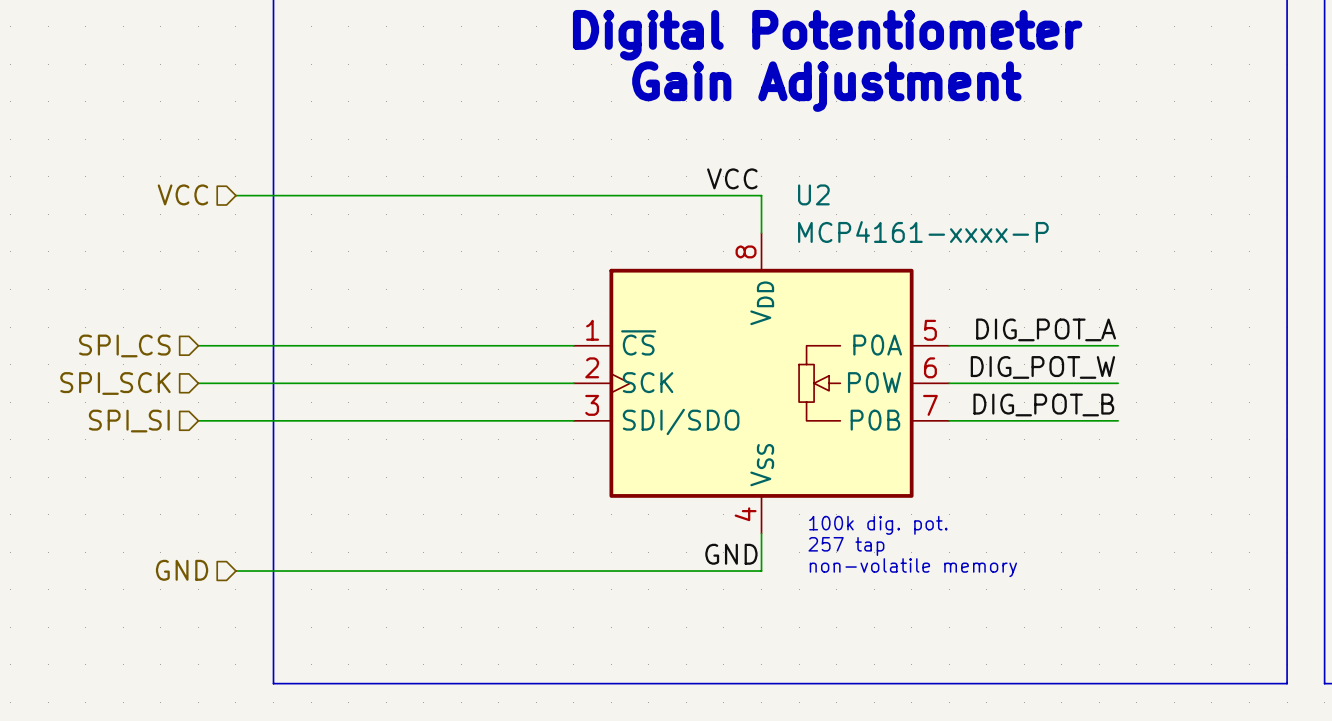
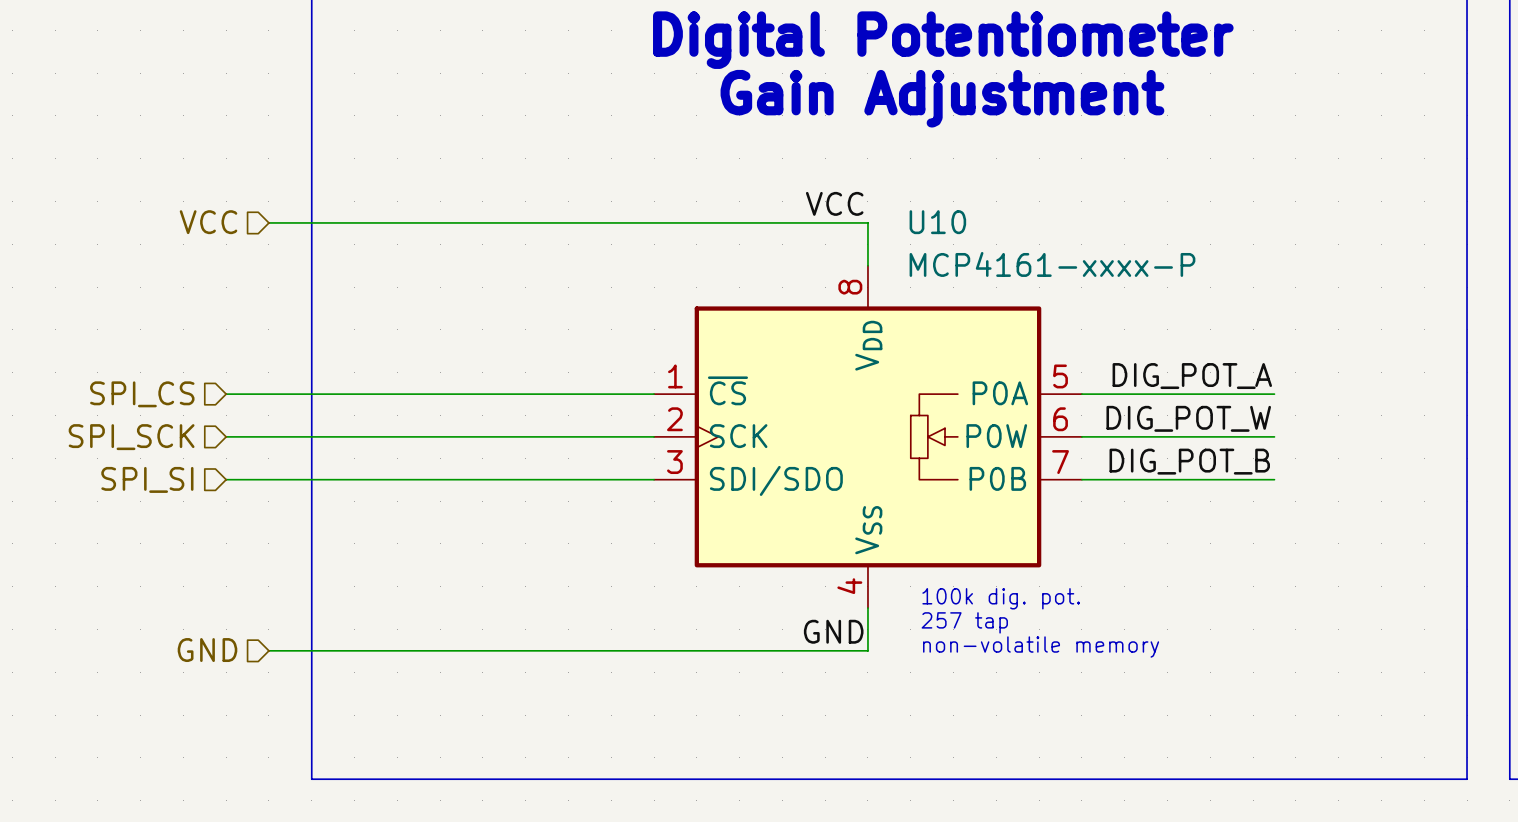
U2 name: U2 (813, 194) -> U10 (937, 222)

